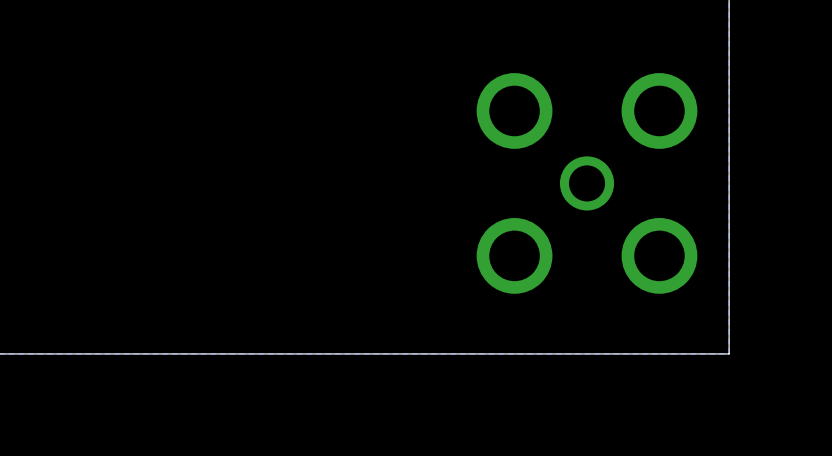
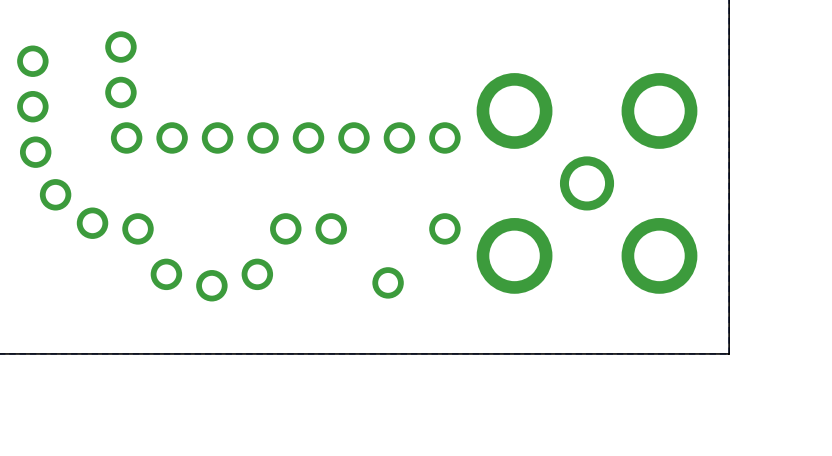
via: none -> (120, 47)
via: none -> (32, 61)
via: none -> (120, 92)
via: none -> (32, 106)
via: none -> (126, 137)
via: none -> (172, 137)
via: none -> (217, 137)
via: none -> (263, 137)
via: none -> (308, 137)
via: none -> (353, 137)
via: none -> (399, 137)
via: none -> (444, 137)
via: none -> (35, 152)
via: none -> (55, 194)
via: none -> (92, 223)
via: none -> (137, 228)
via: none -> (285, 228)
via: none -> (331, 228)
via: none -> (444, 228)
via: none -> (166, 274)
via: none -> (257, 274)
via: none -> (388, 282)
via: none -> (211, 285)

